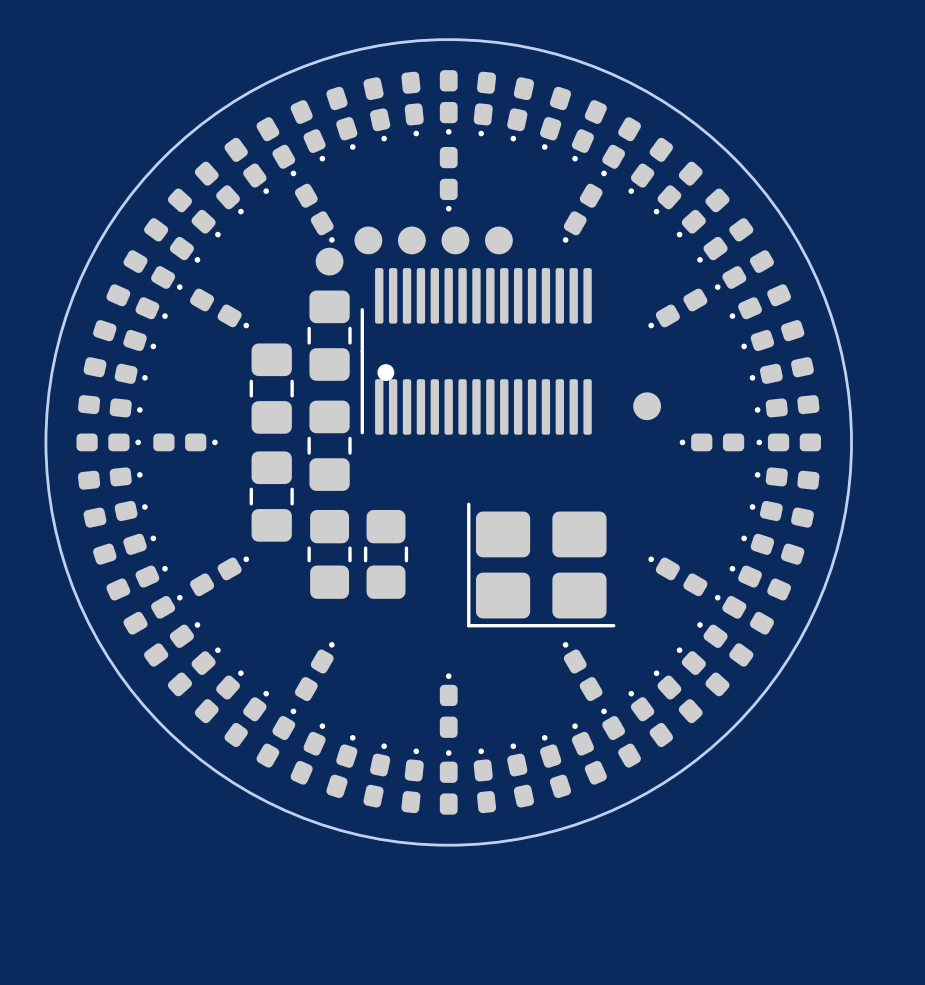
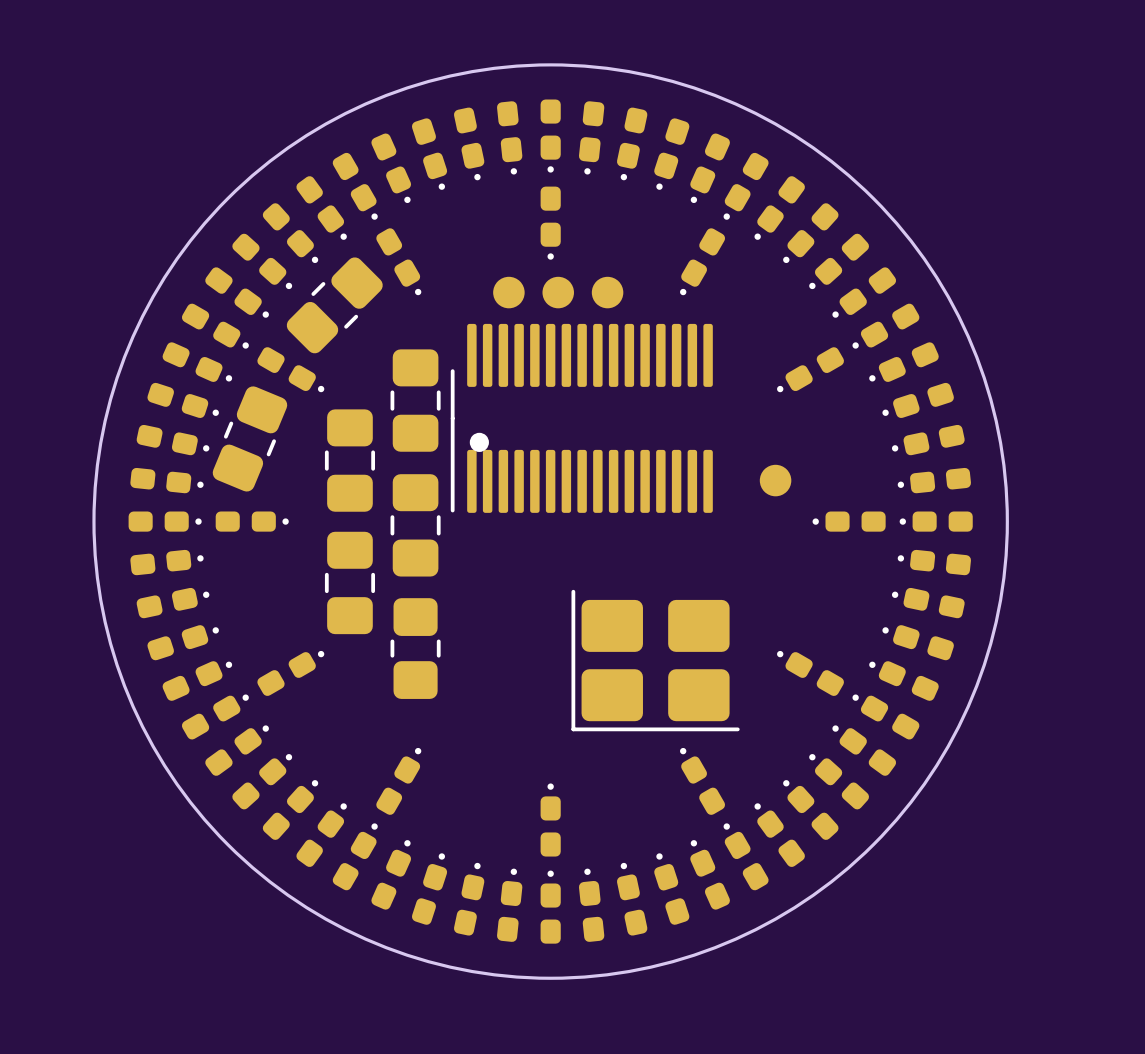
part: (368, 240) -> none
part: none -> (334, 305)
part: (329, 261) -> none
part: none -> (249, 438)
part: (386, 554) -> none

